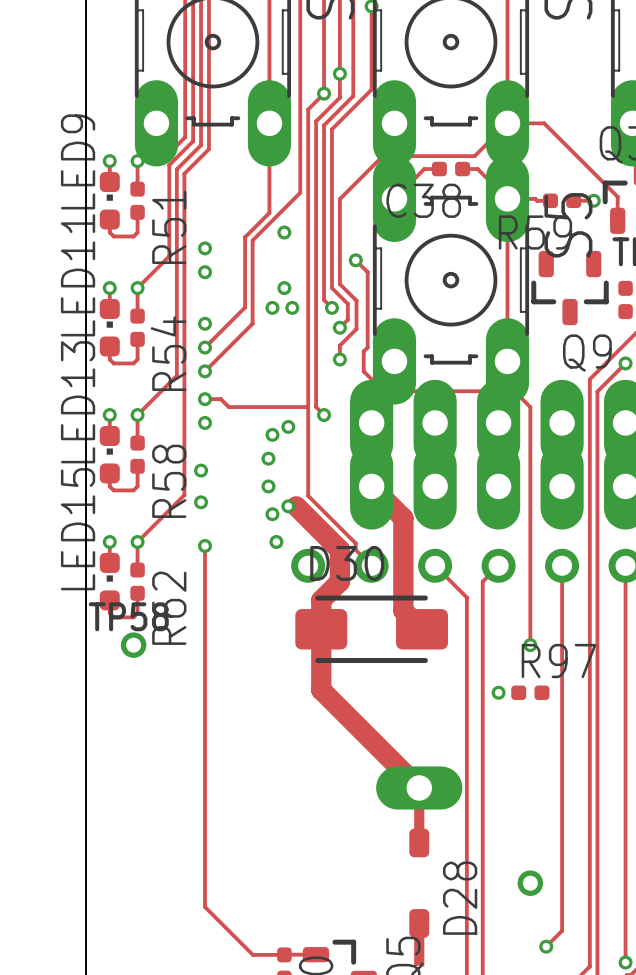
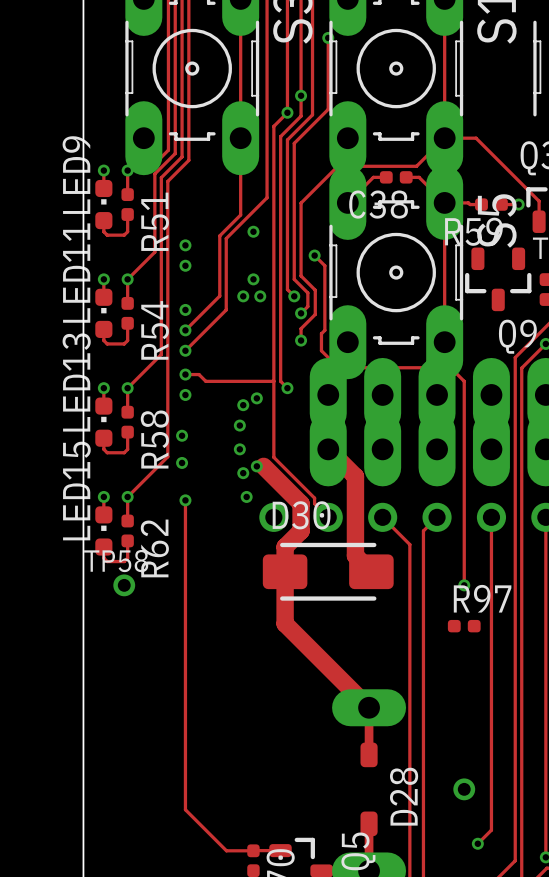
via: (498, 692) -> none

